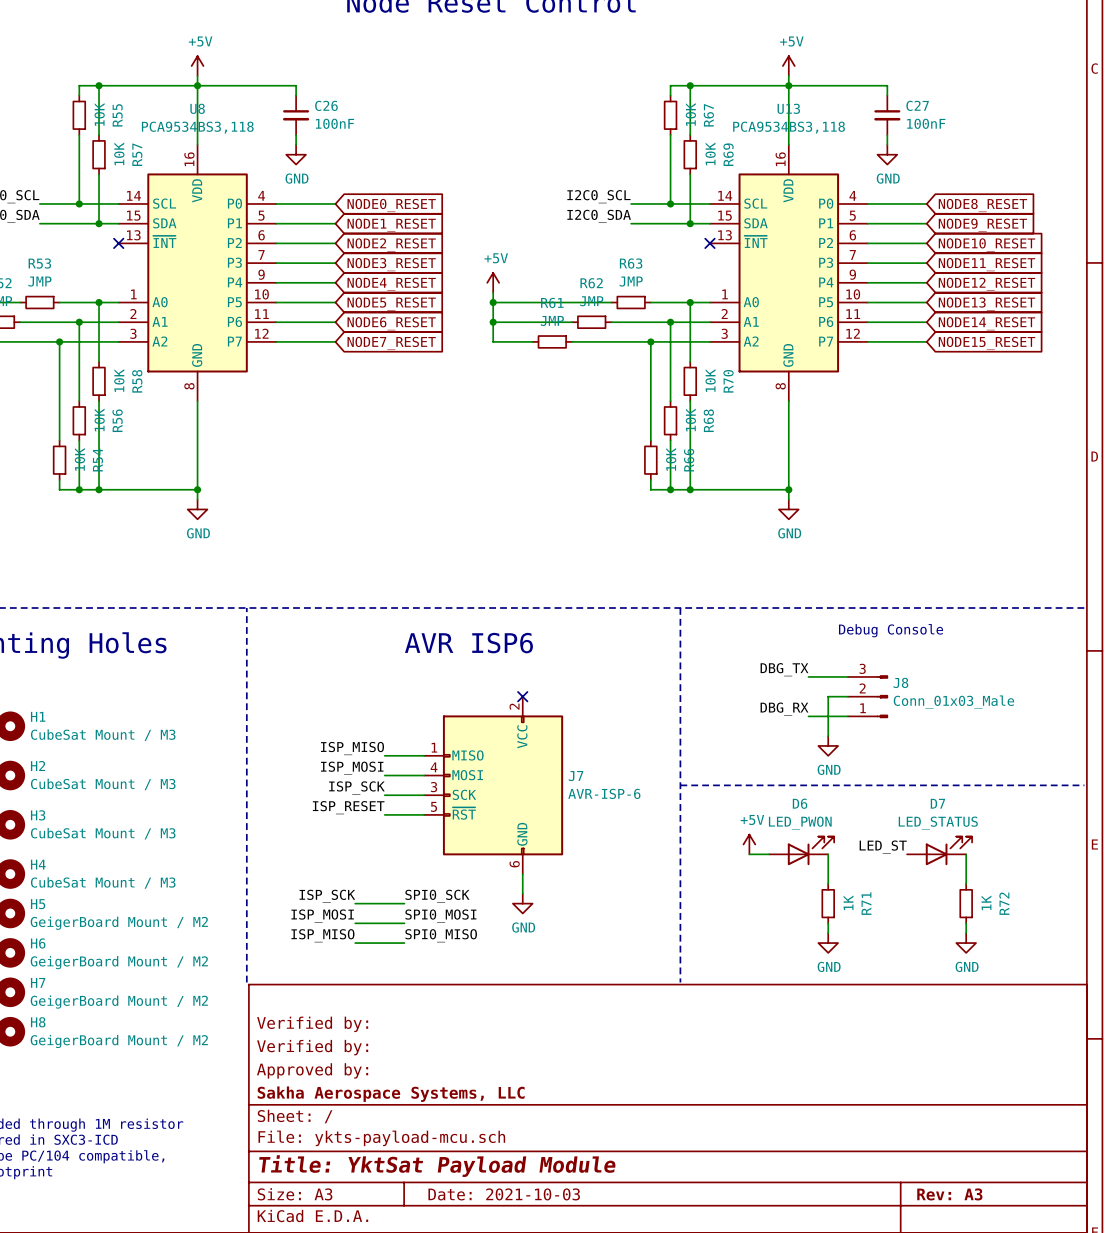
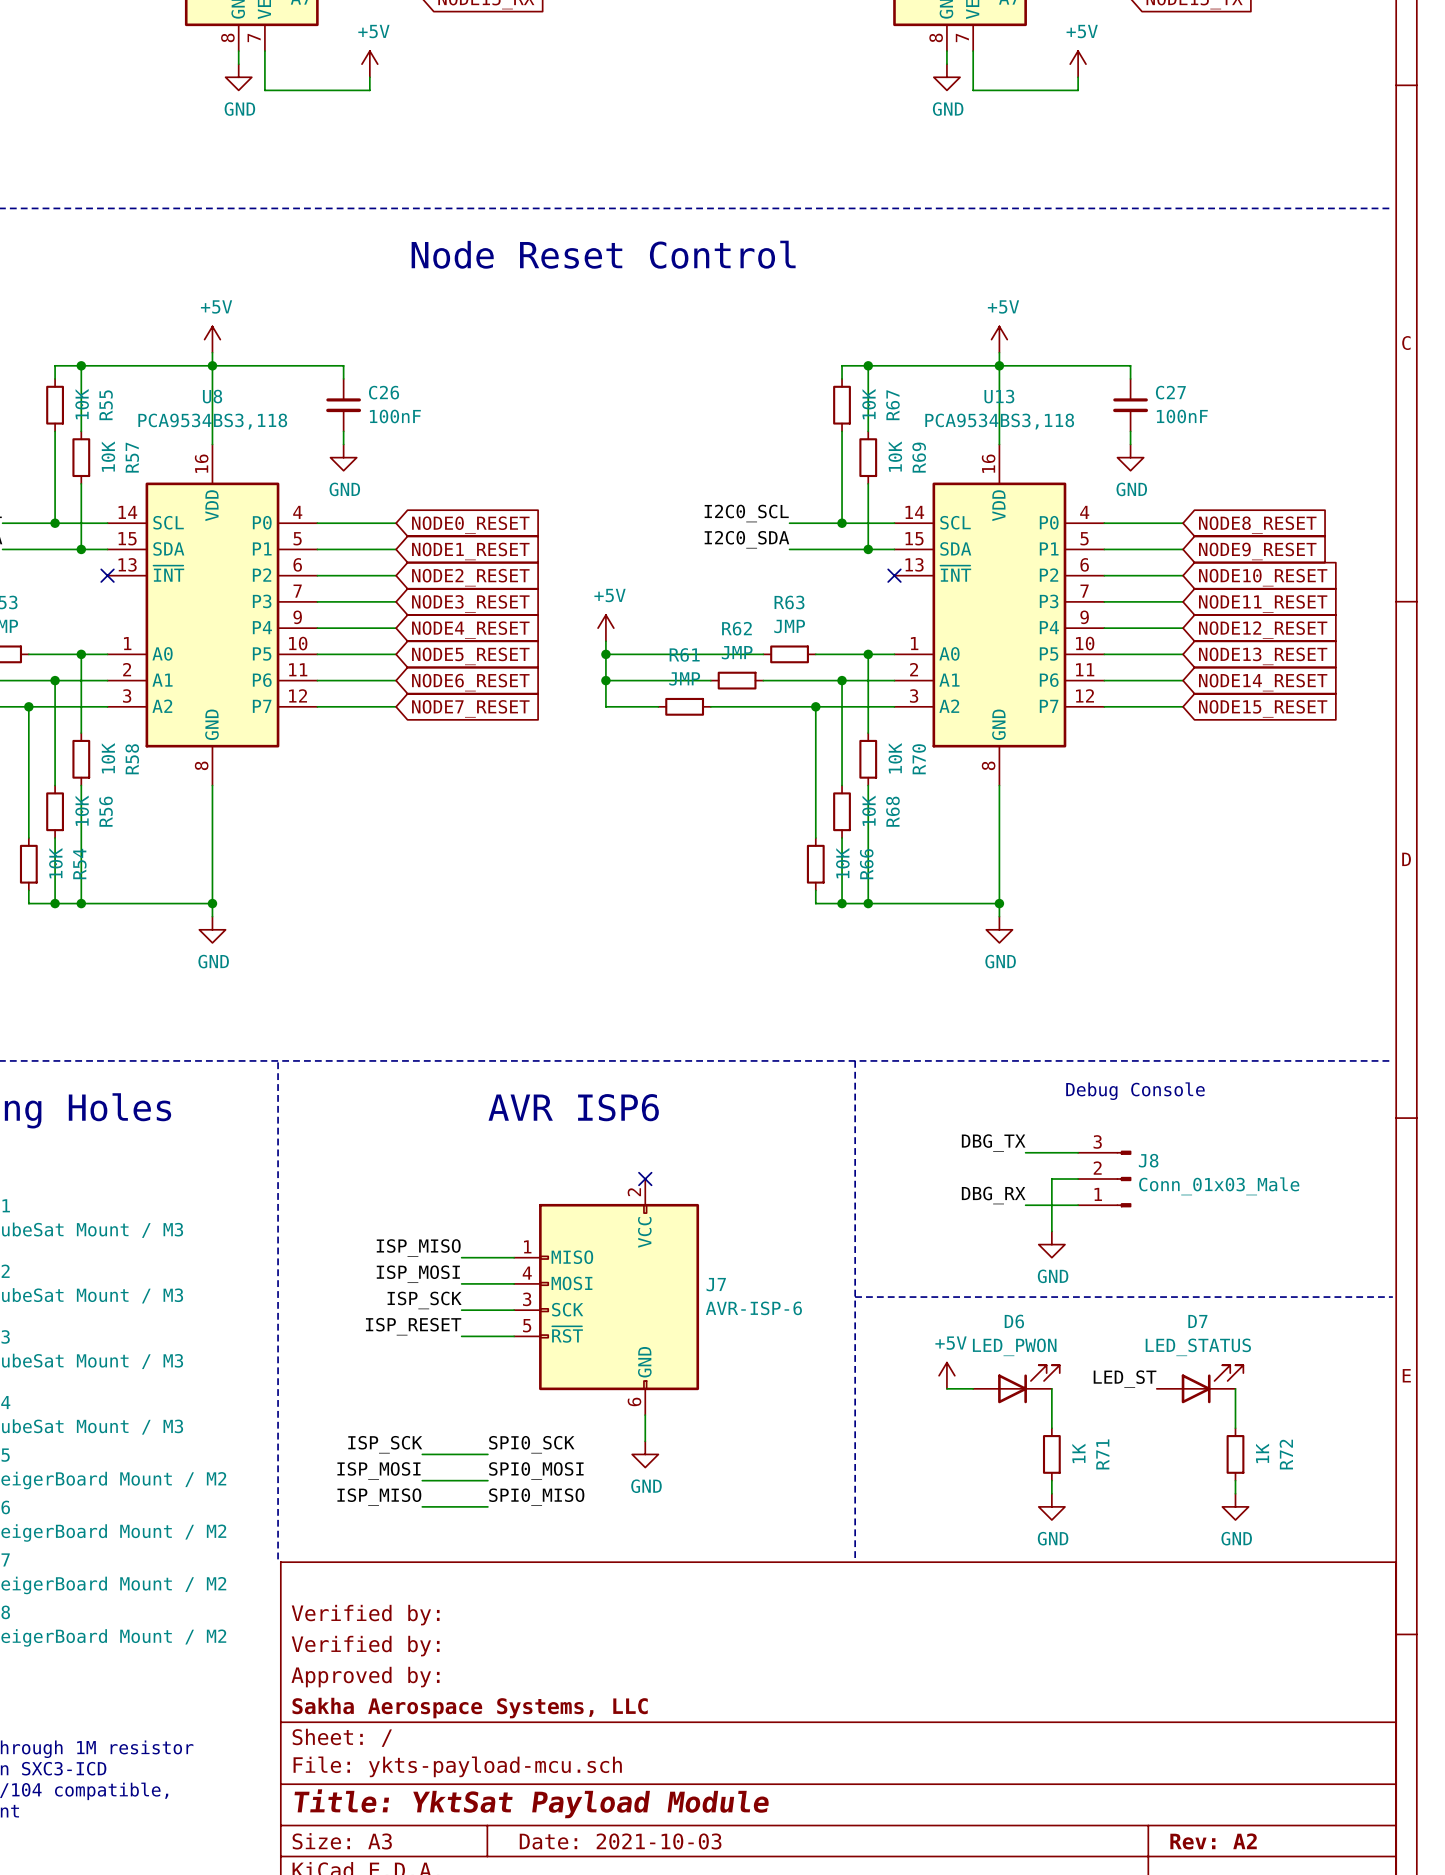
title block: Rev: A3 (949, 1194) -> Rev: A2 (1213, 1841)

